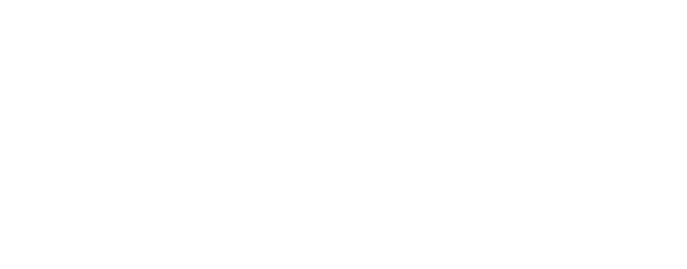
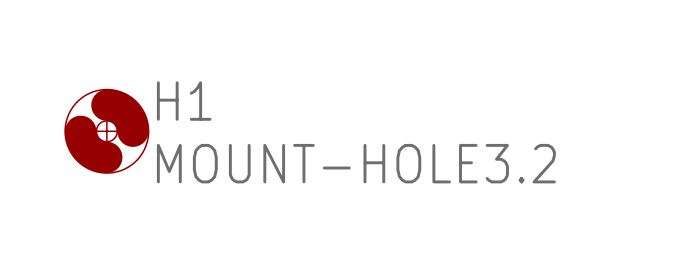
H1: none -> MOUNT-HOLE3.2 (106, 131)

